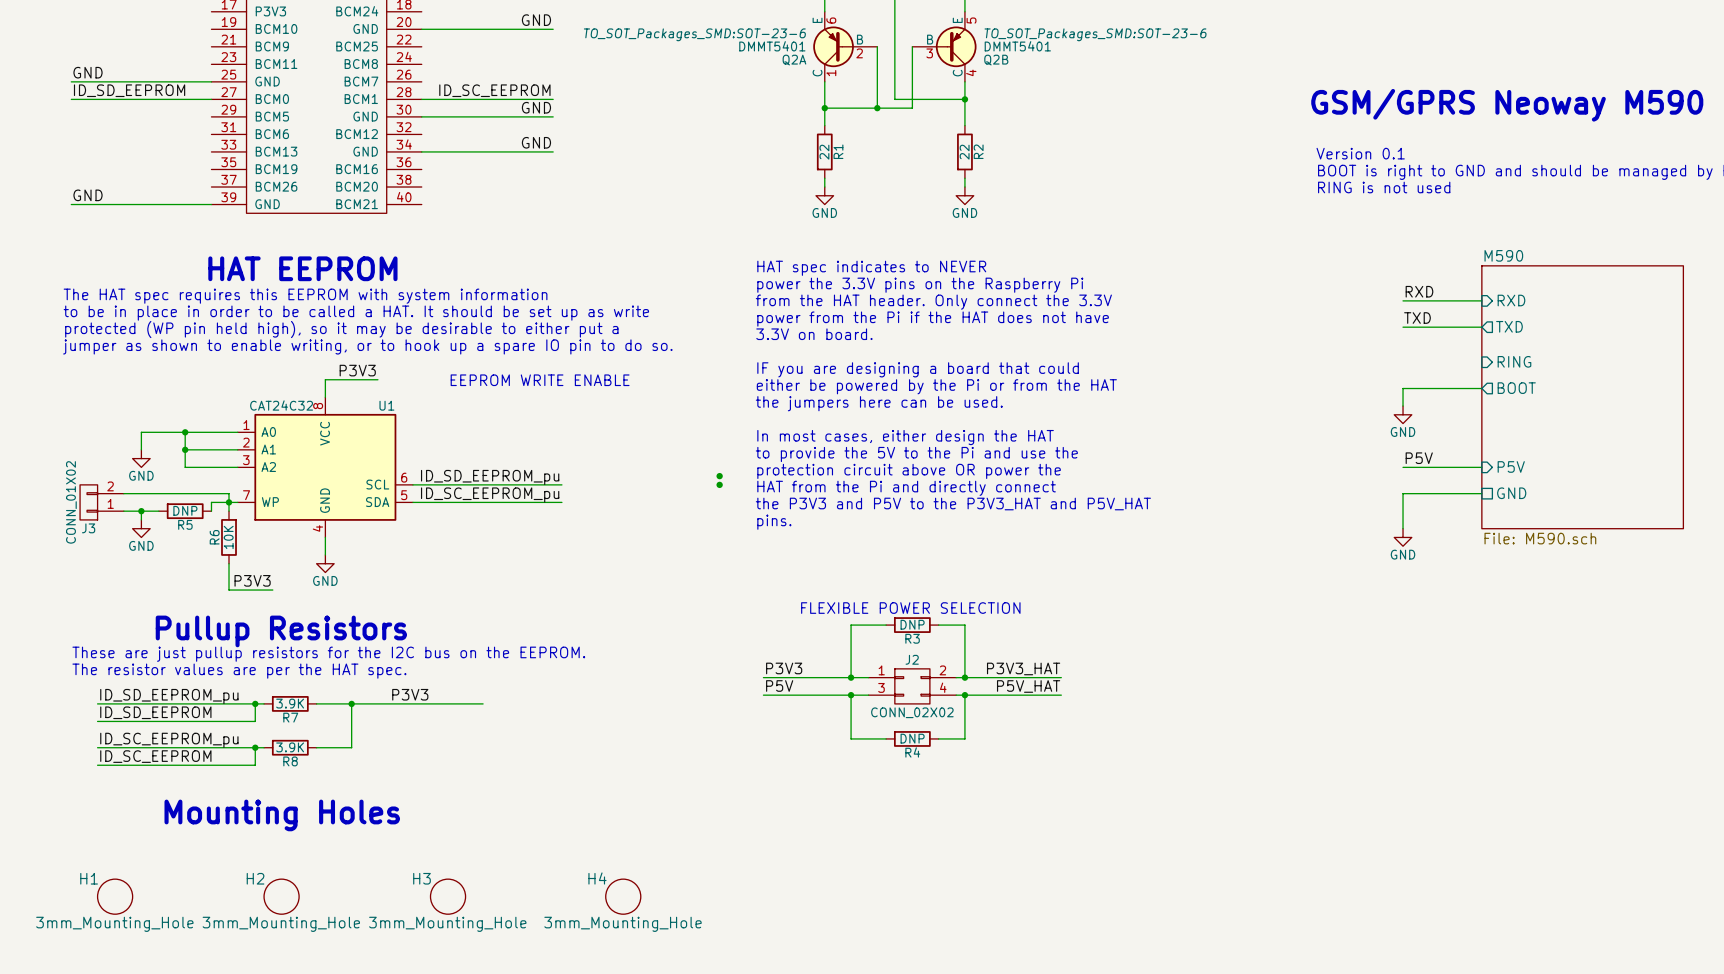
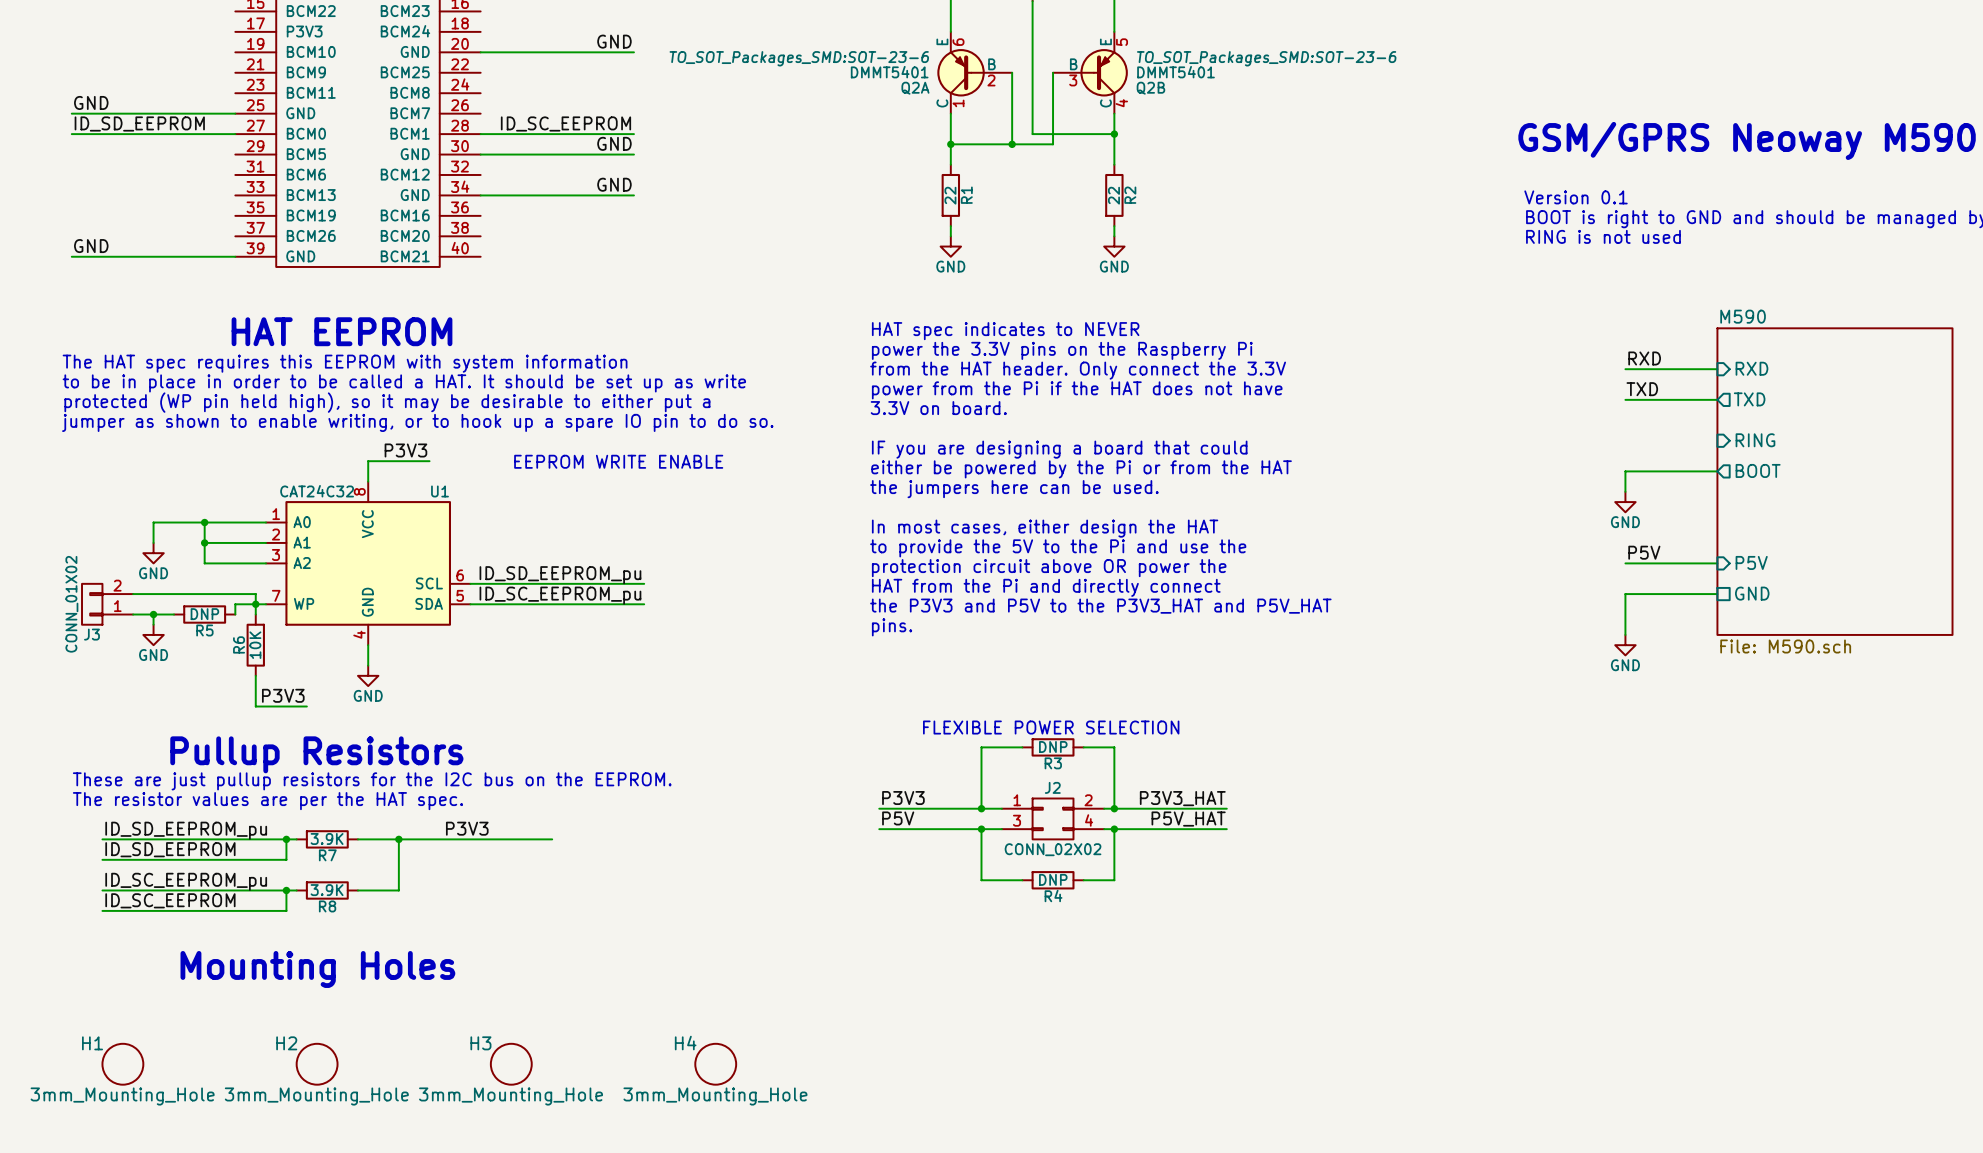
junction: (719, 476) -> none
junction: (719, 484) -> none

